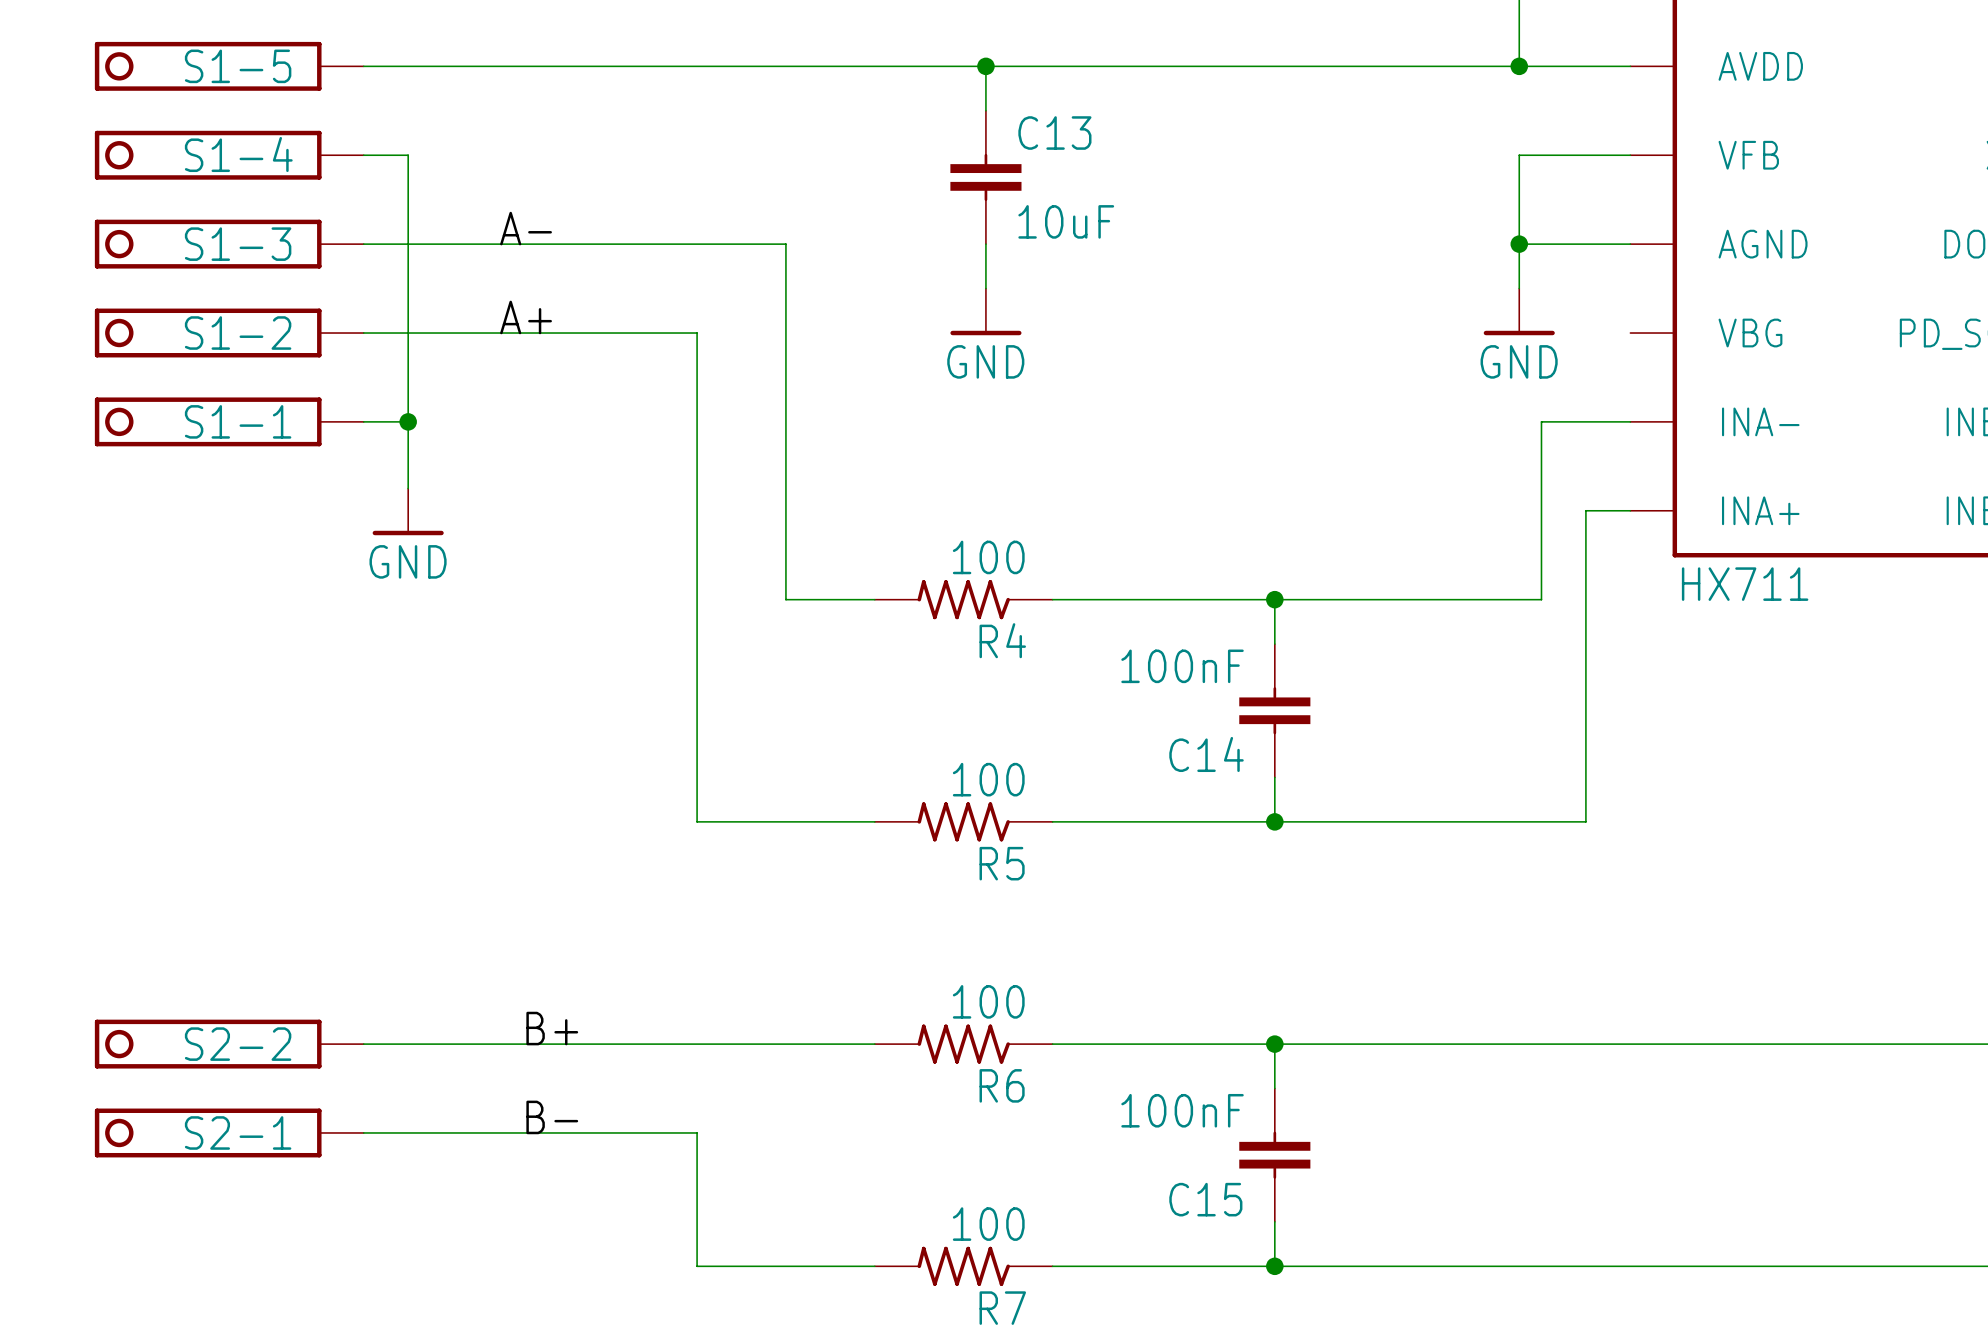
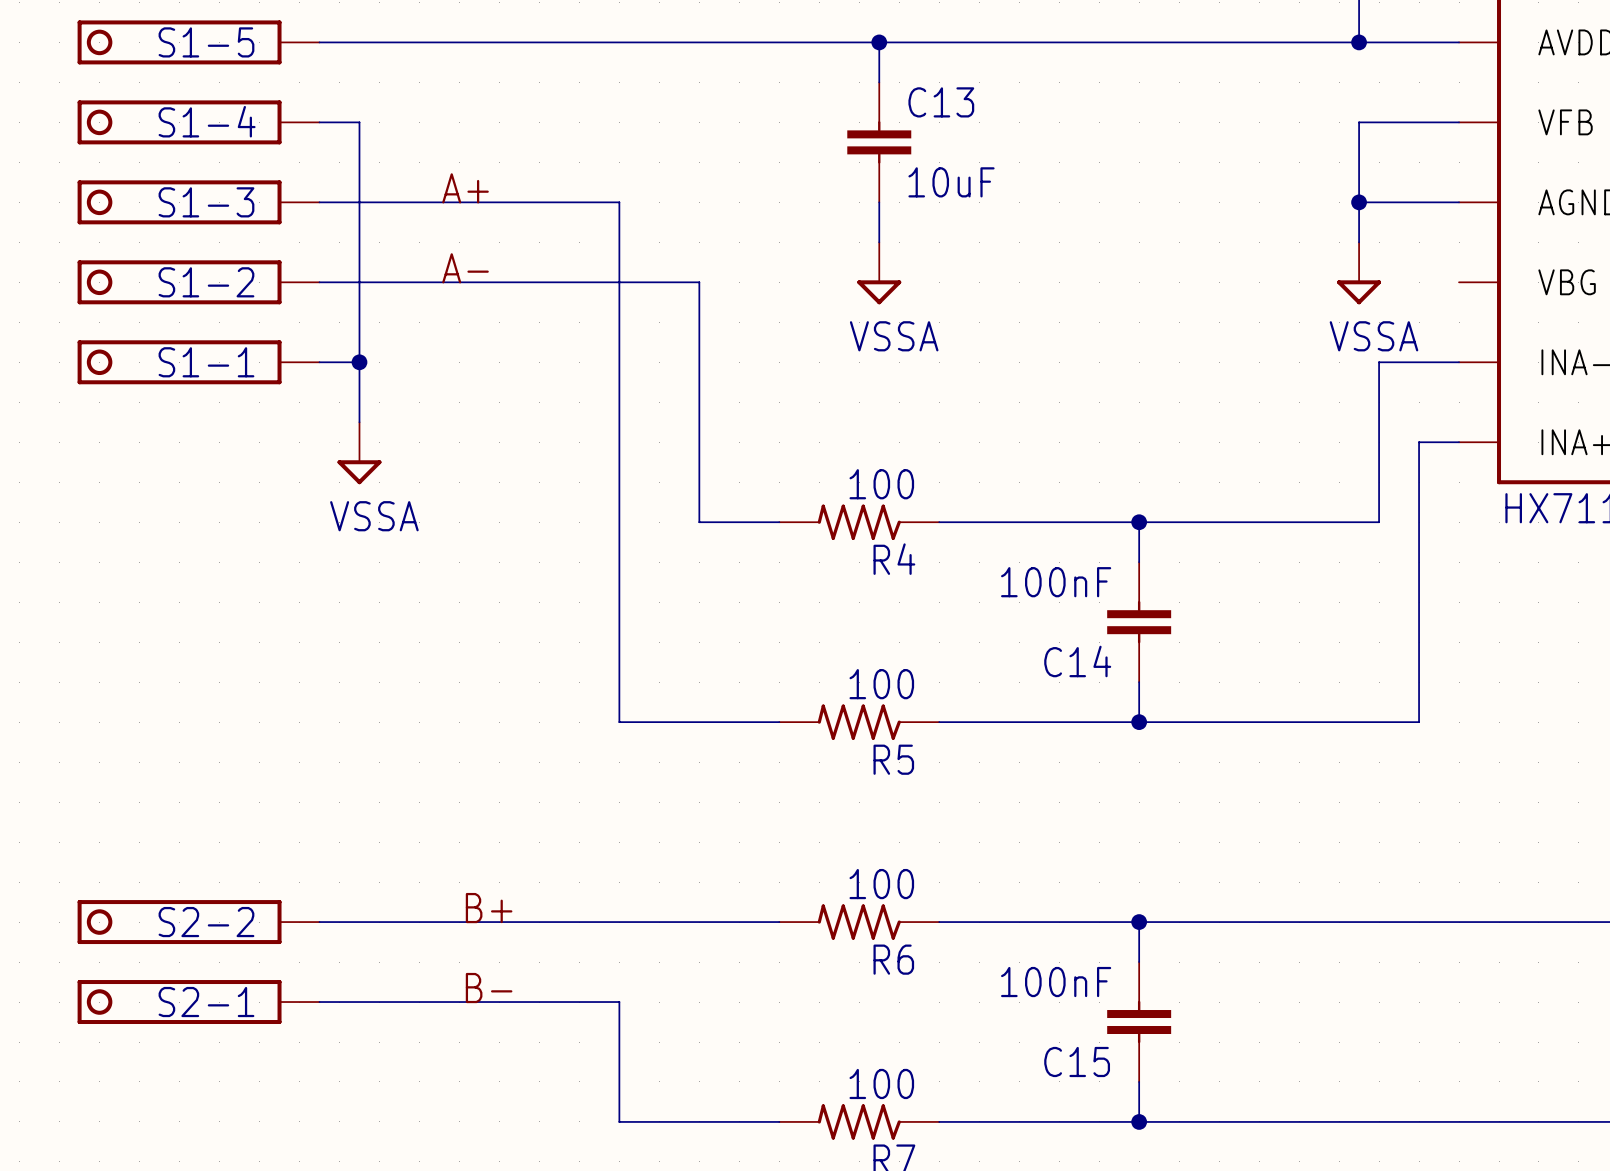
label: A- (526, 228) -> A+ (465, 188)
wire: (697, 244) (785, 244) (785, 333) -> (619, 202) (619, 282) (699, 282)
power symbol: GND (985, 311) -> VSSA (879, 273)
power symbol: GND (1519, 311) -> VSSA (1359, 273)
label: A+ (526, 317) -> A- (465, 268)
power symbol: GND (408, 511) -> VSSA (359, 453)

